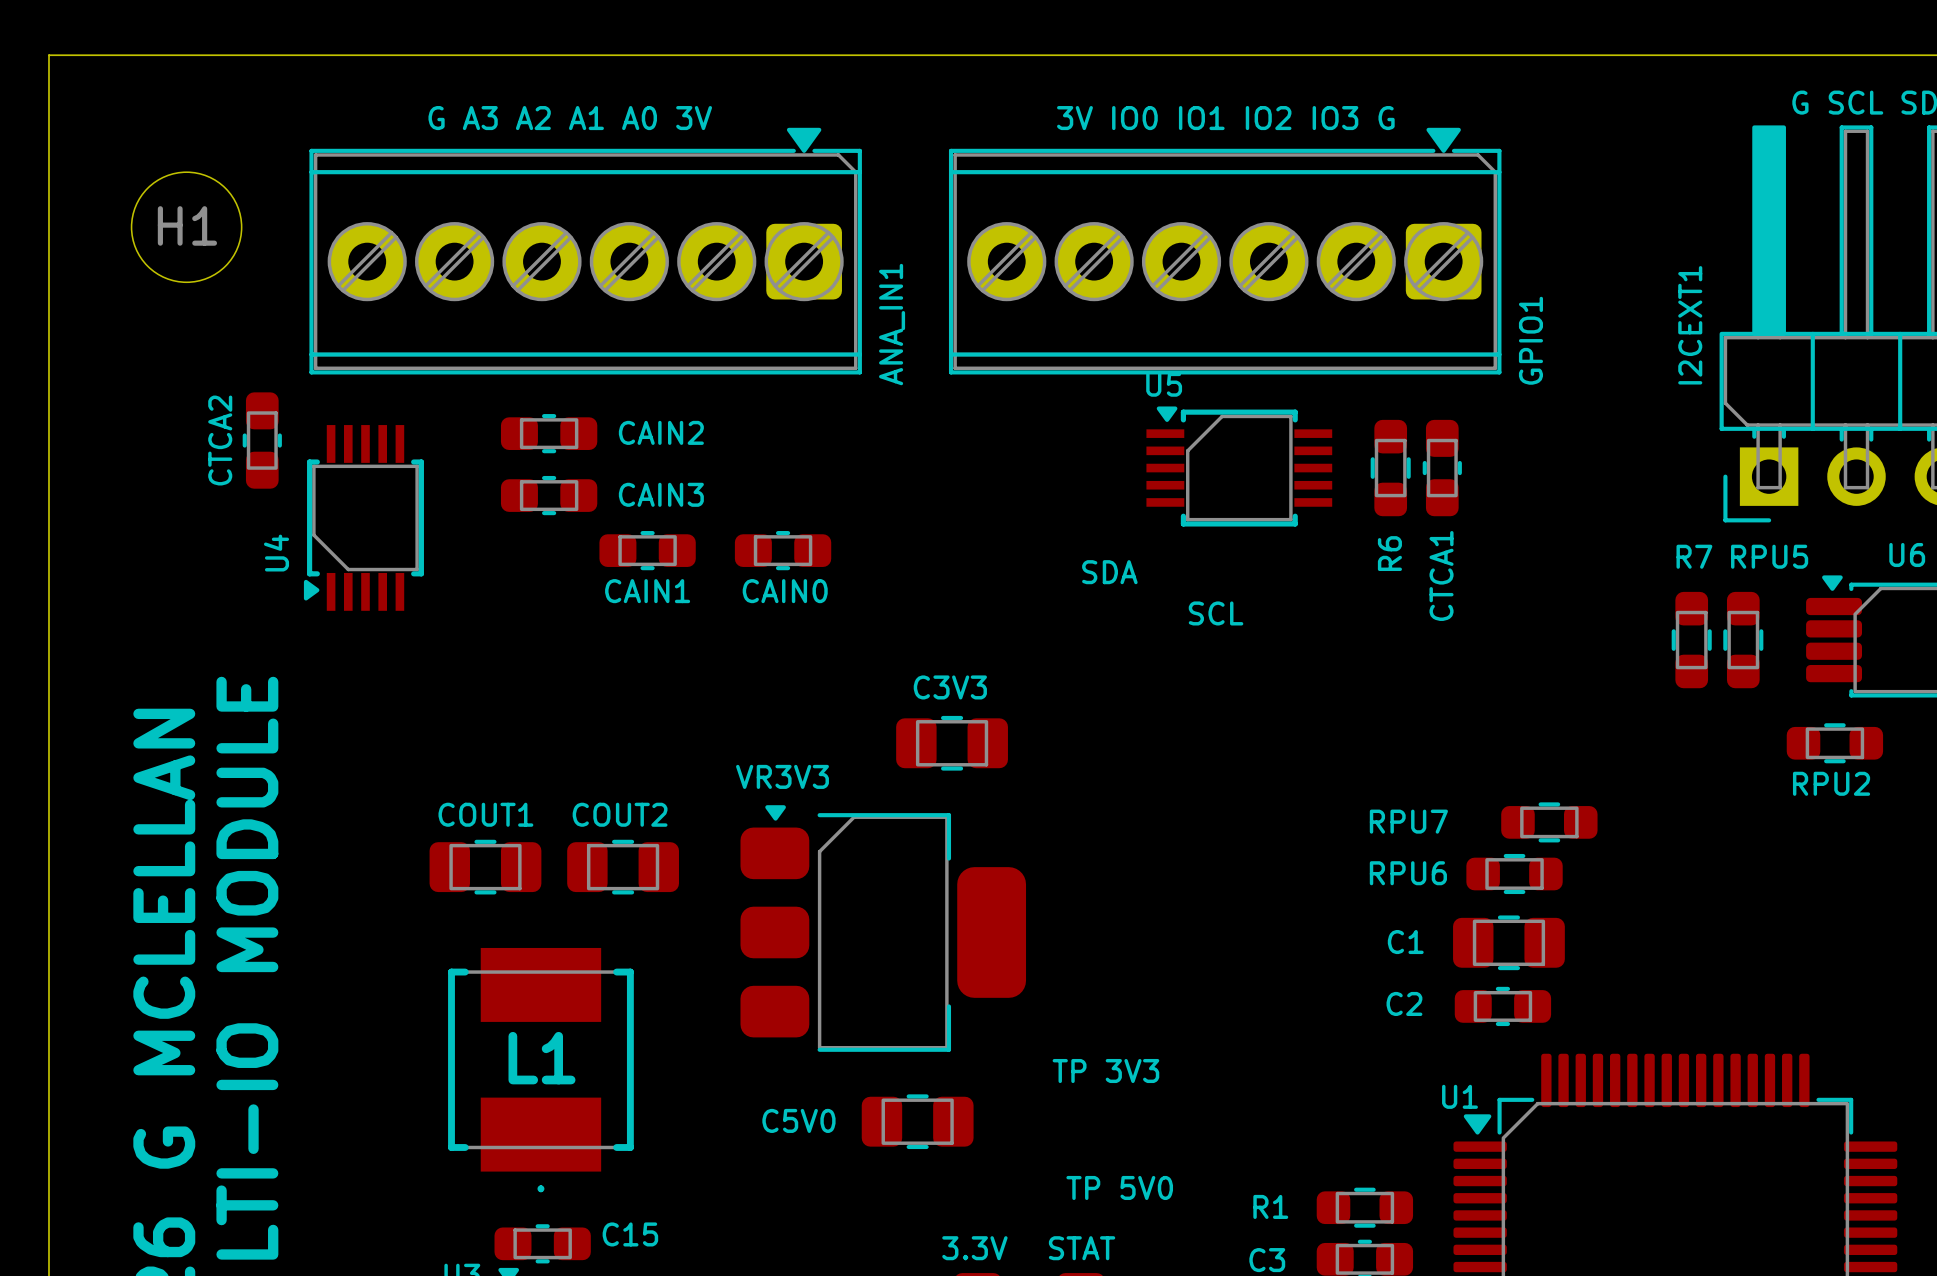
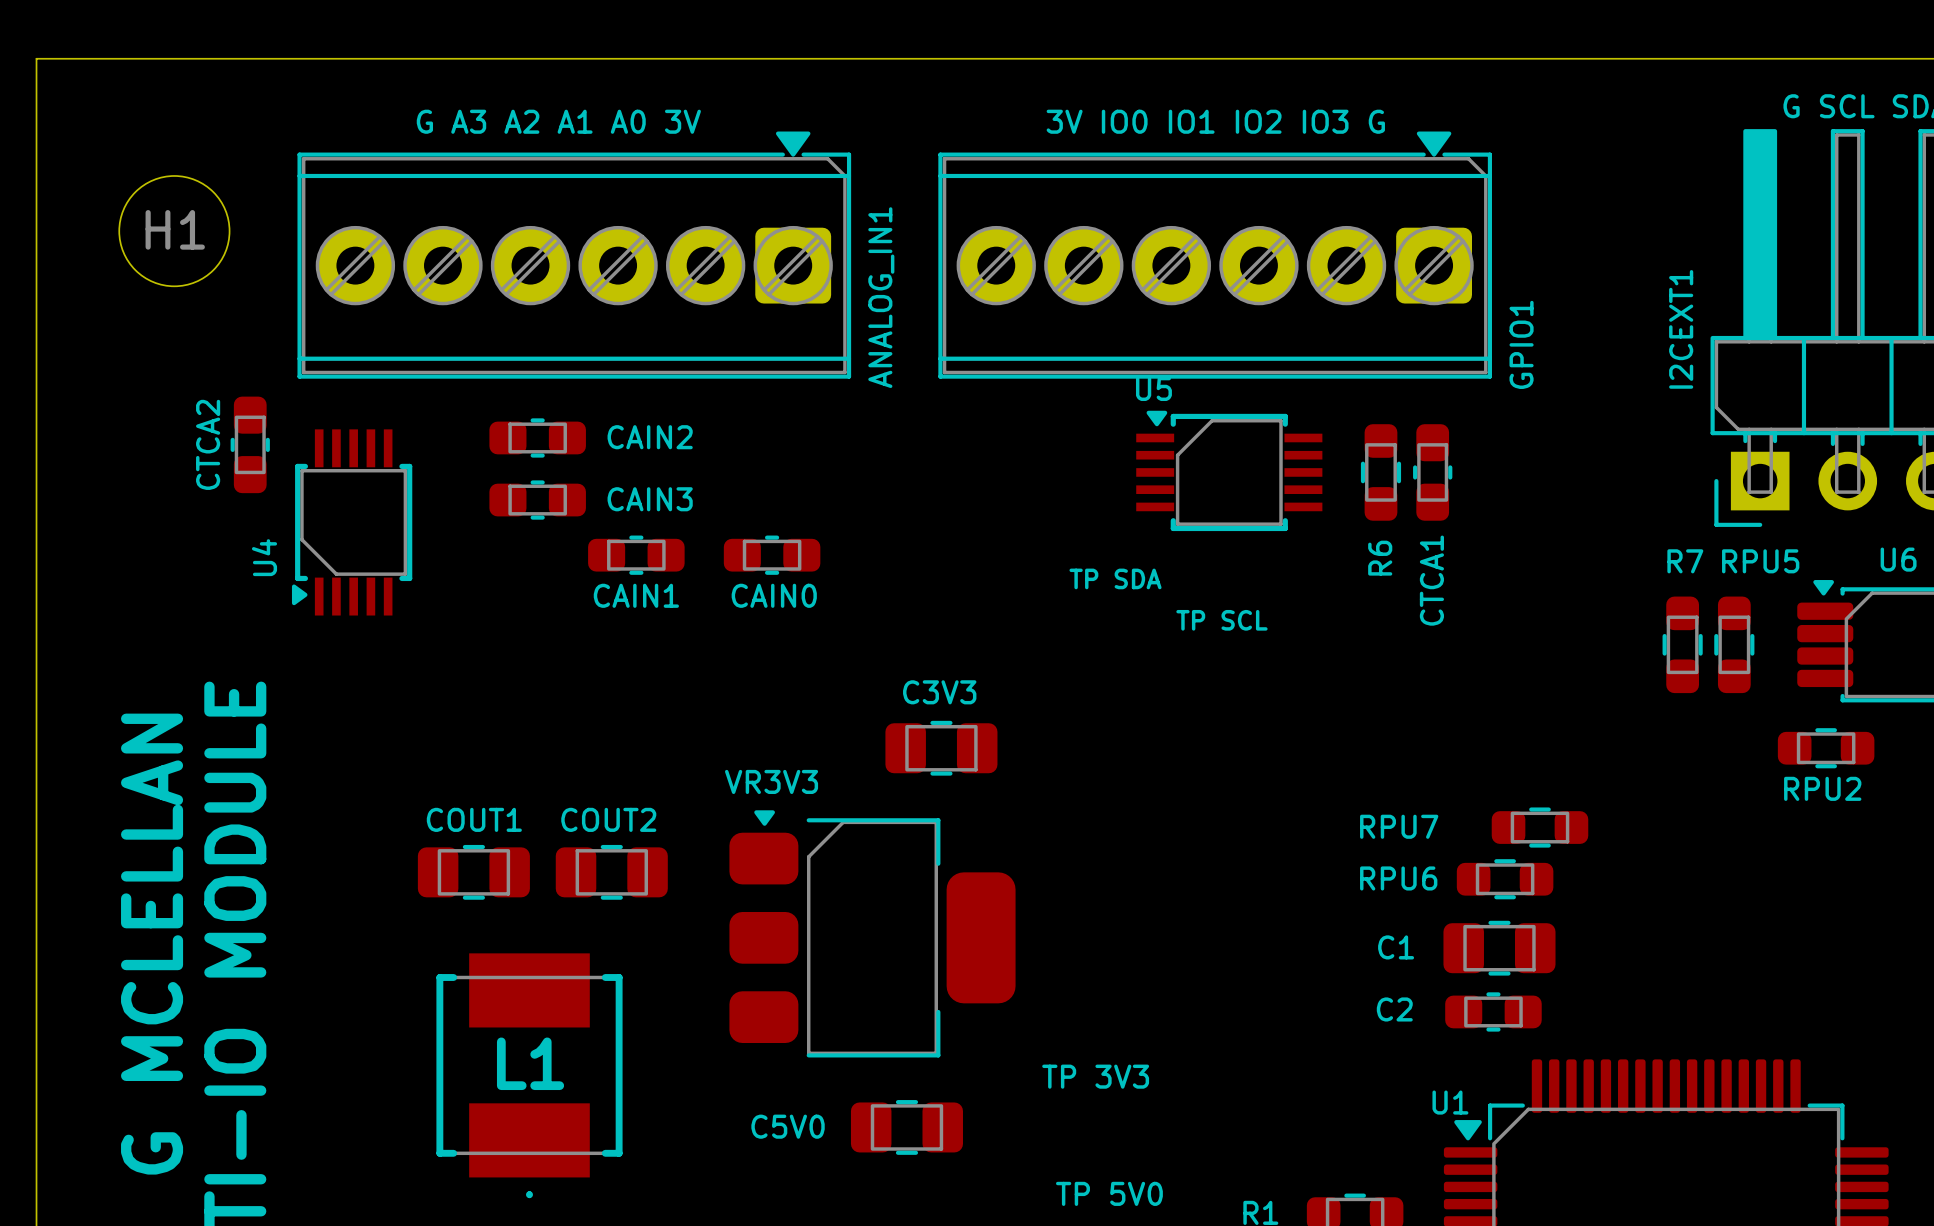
ANA_IN1 name: ANA_IN1 (892, 324) -> ANALOG_IN1 (881, 297)
text: SDA (1109, 572) -> TP SDA (1115, 578)
text: SCL (1216, 613) -> TP SCL (1221, 620)

